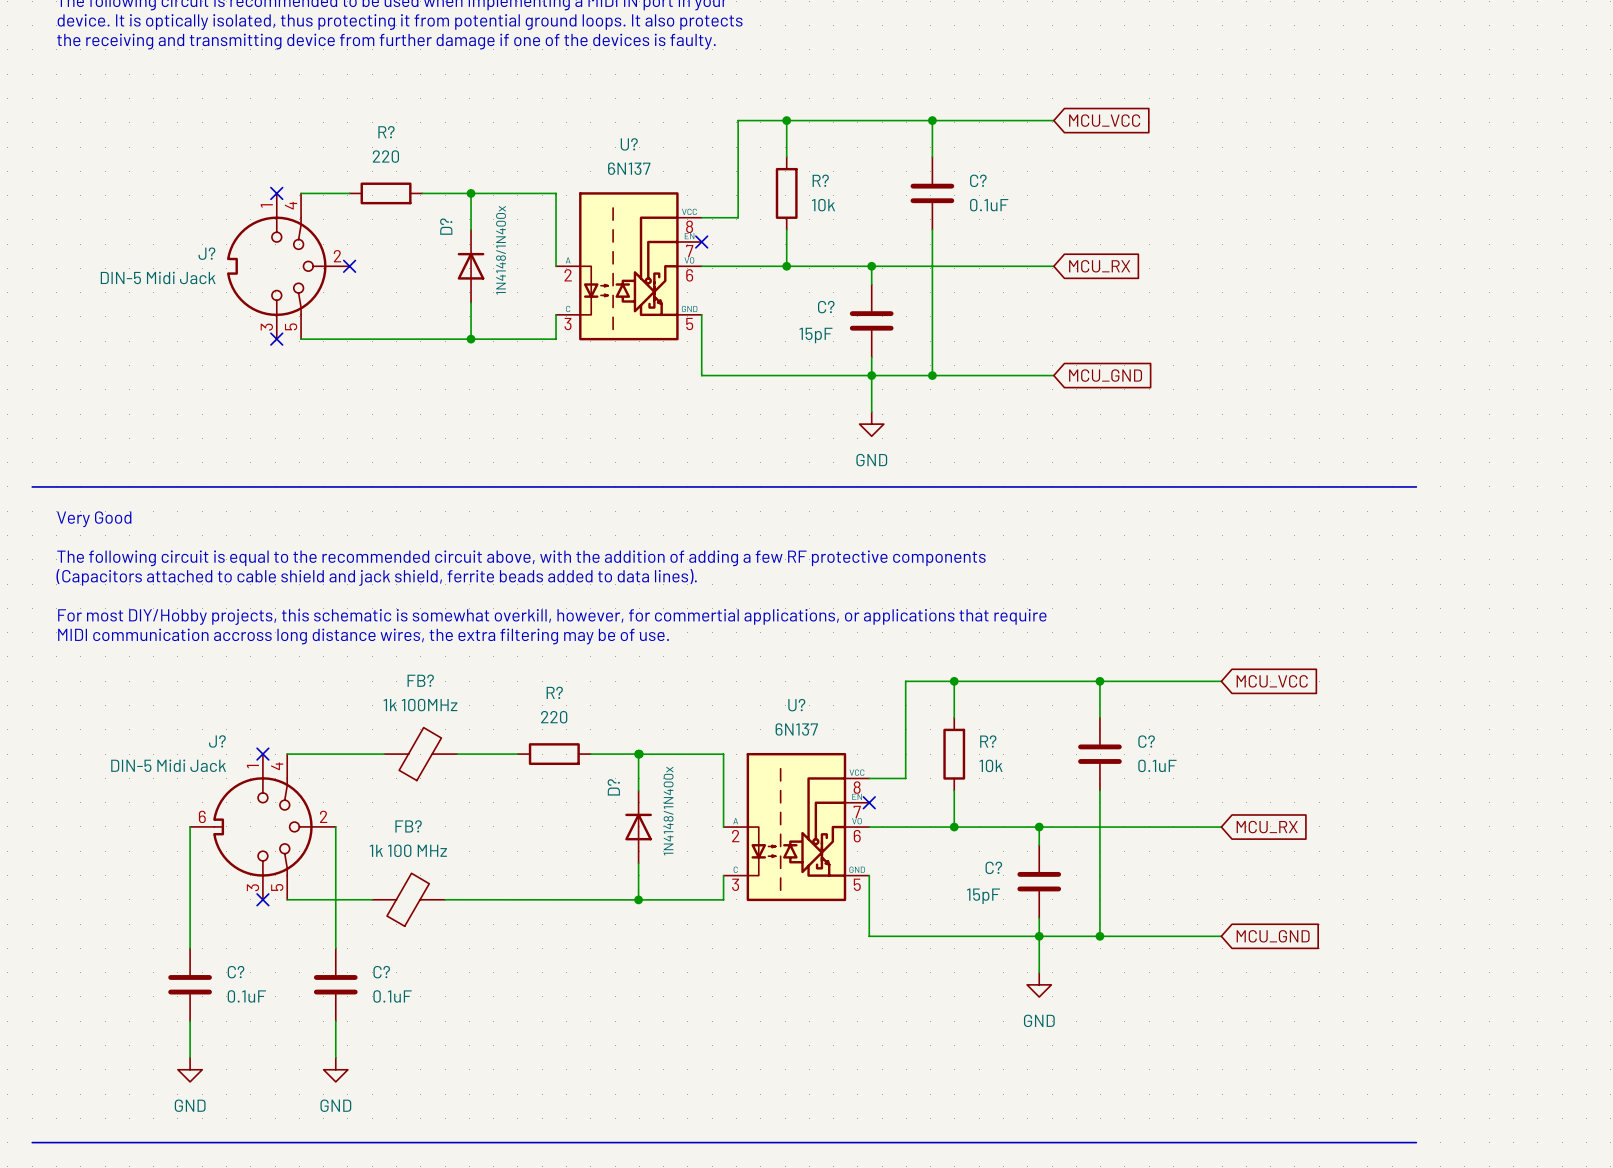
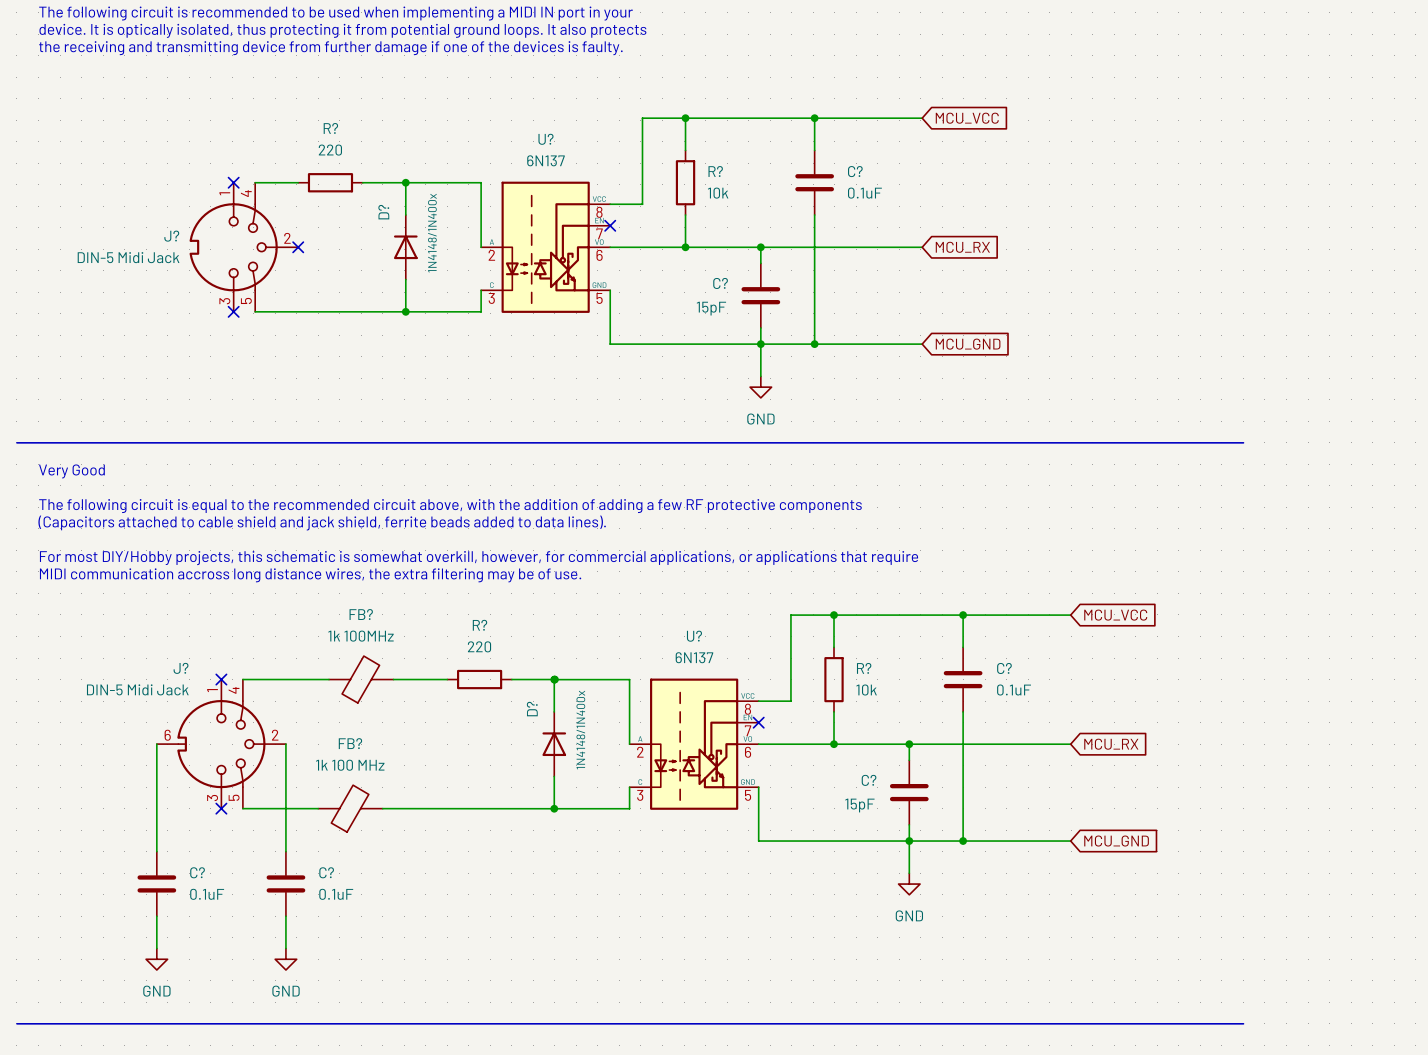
text: For most DIY/Hobby projects, this schematic is somewhat overkill, however, for commertial applications, or applications that require (552, 617) -> For most DIY/Hobby projects, this schematic is somewhat overkill, however, for commercial applications, or applications that require (479, 558)

